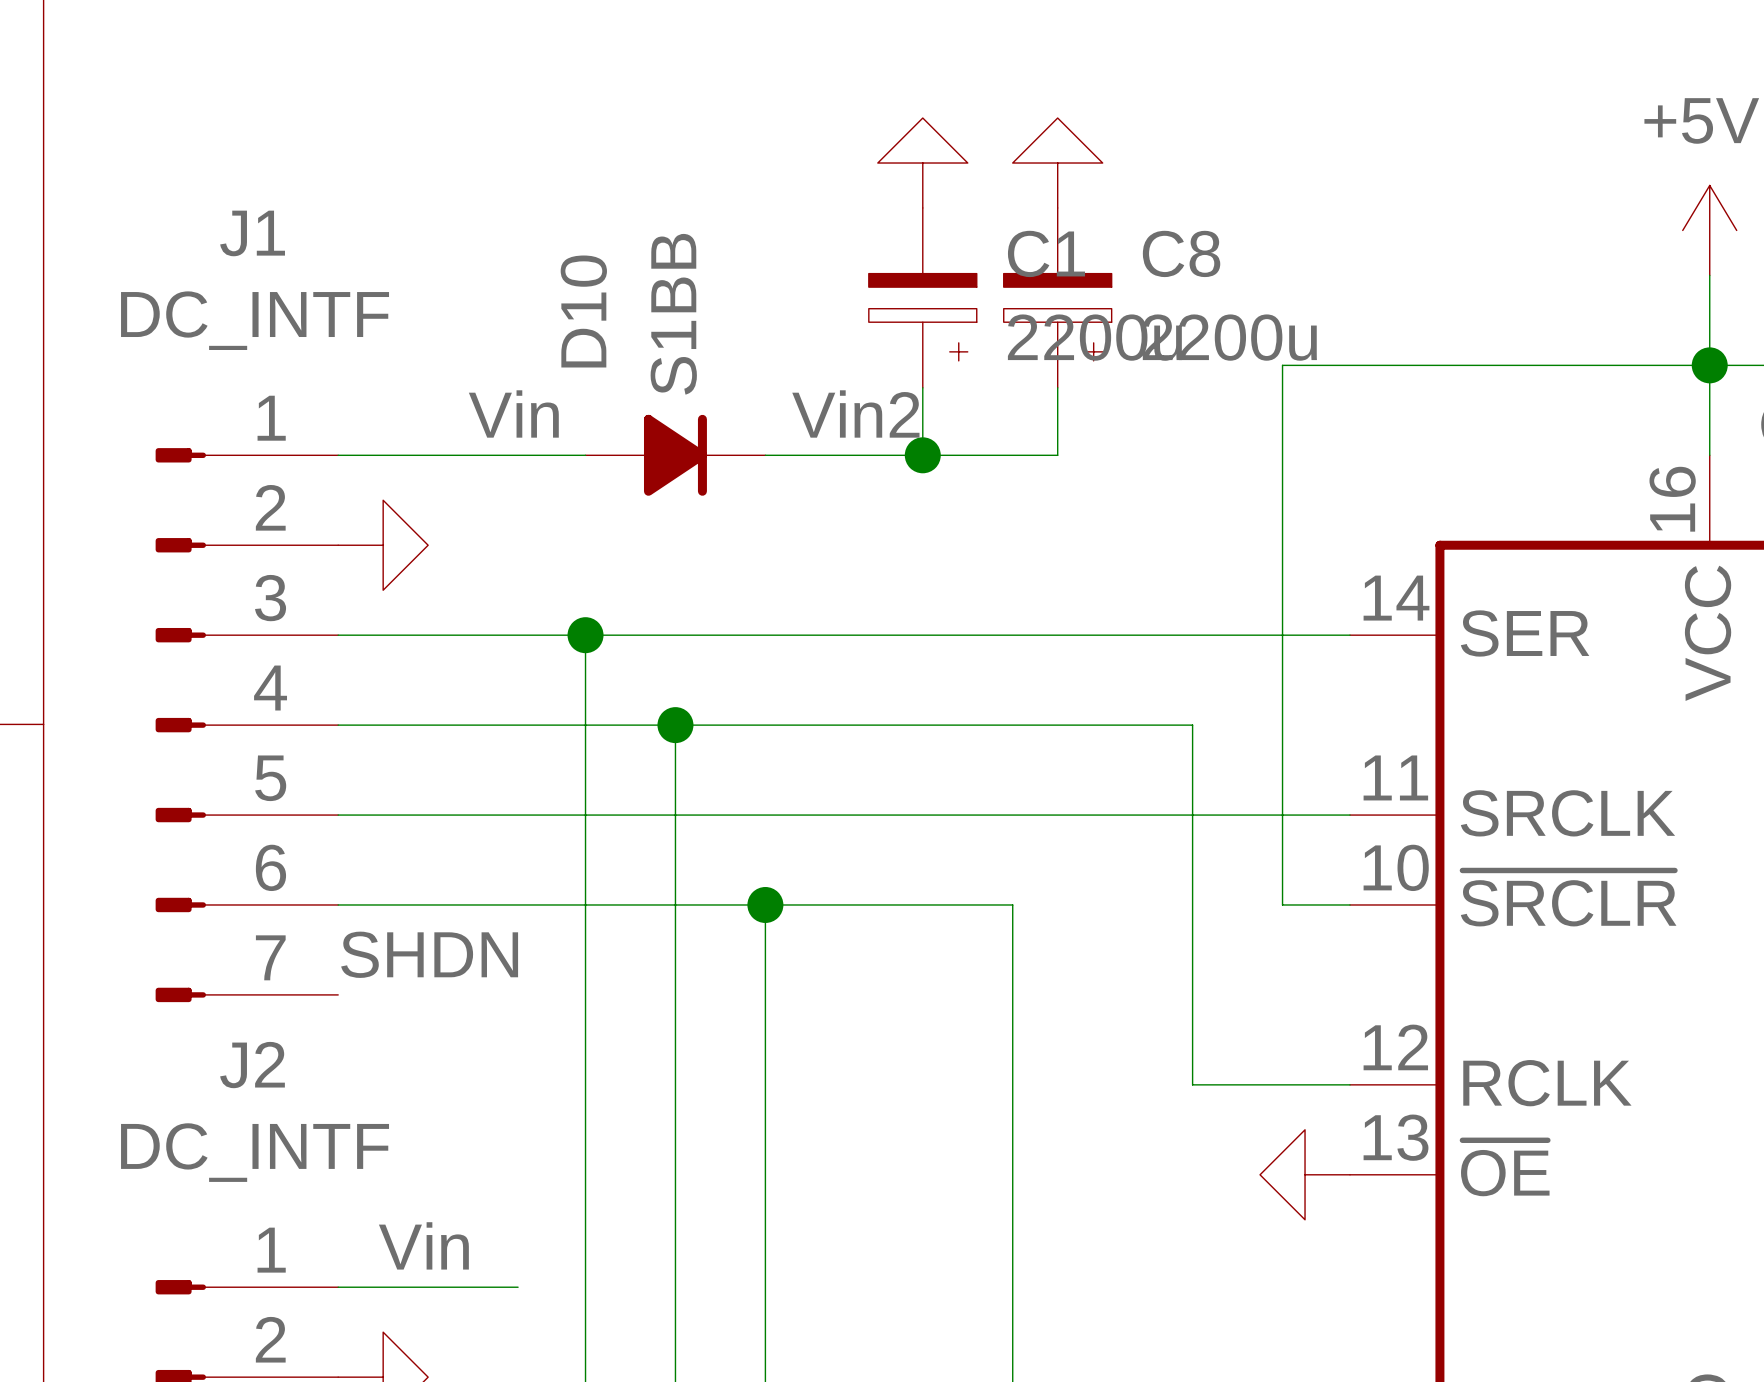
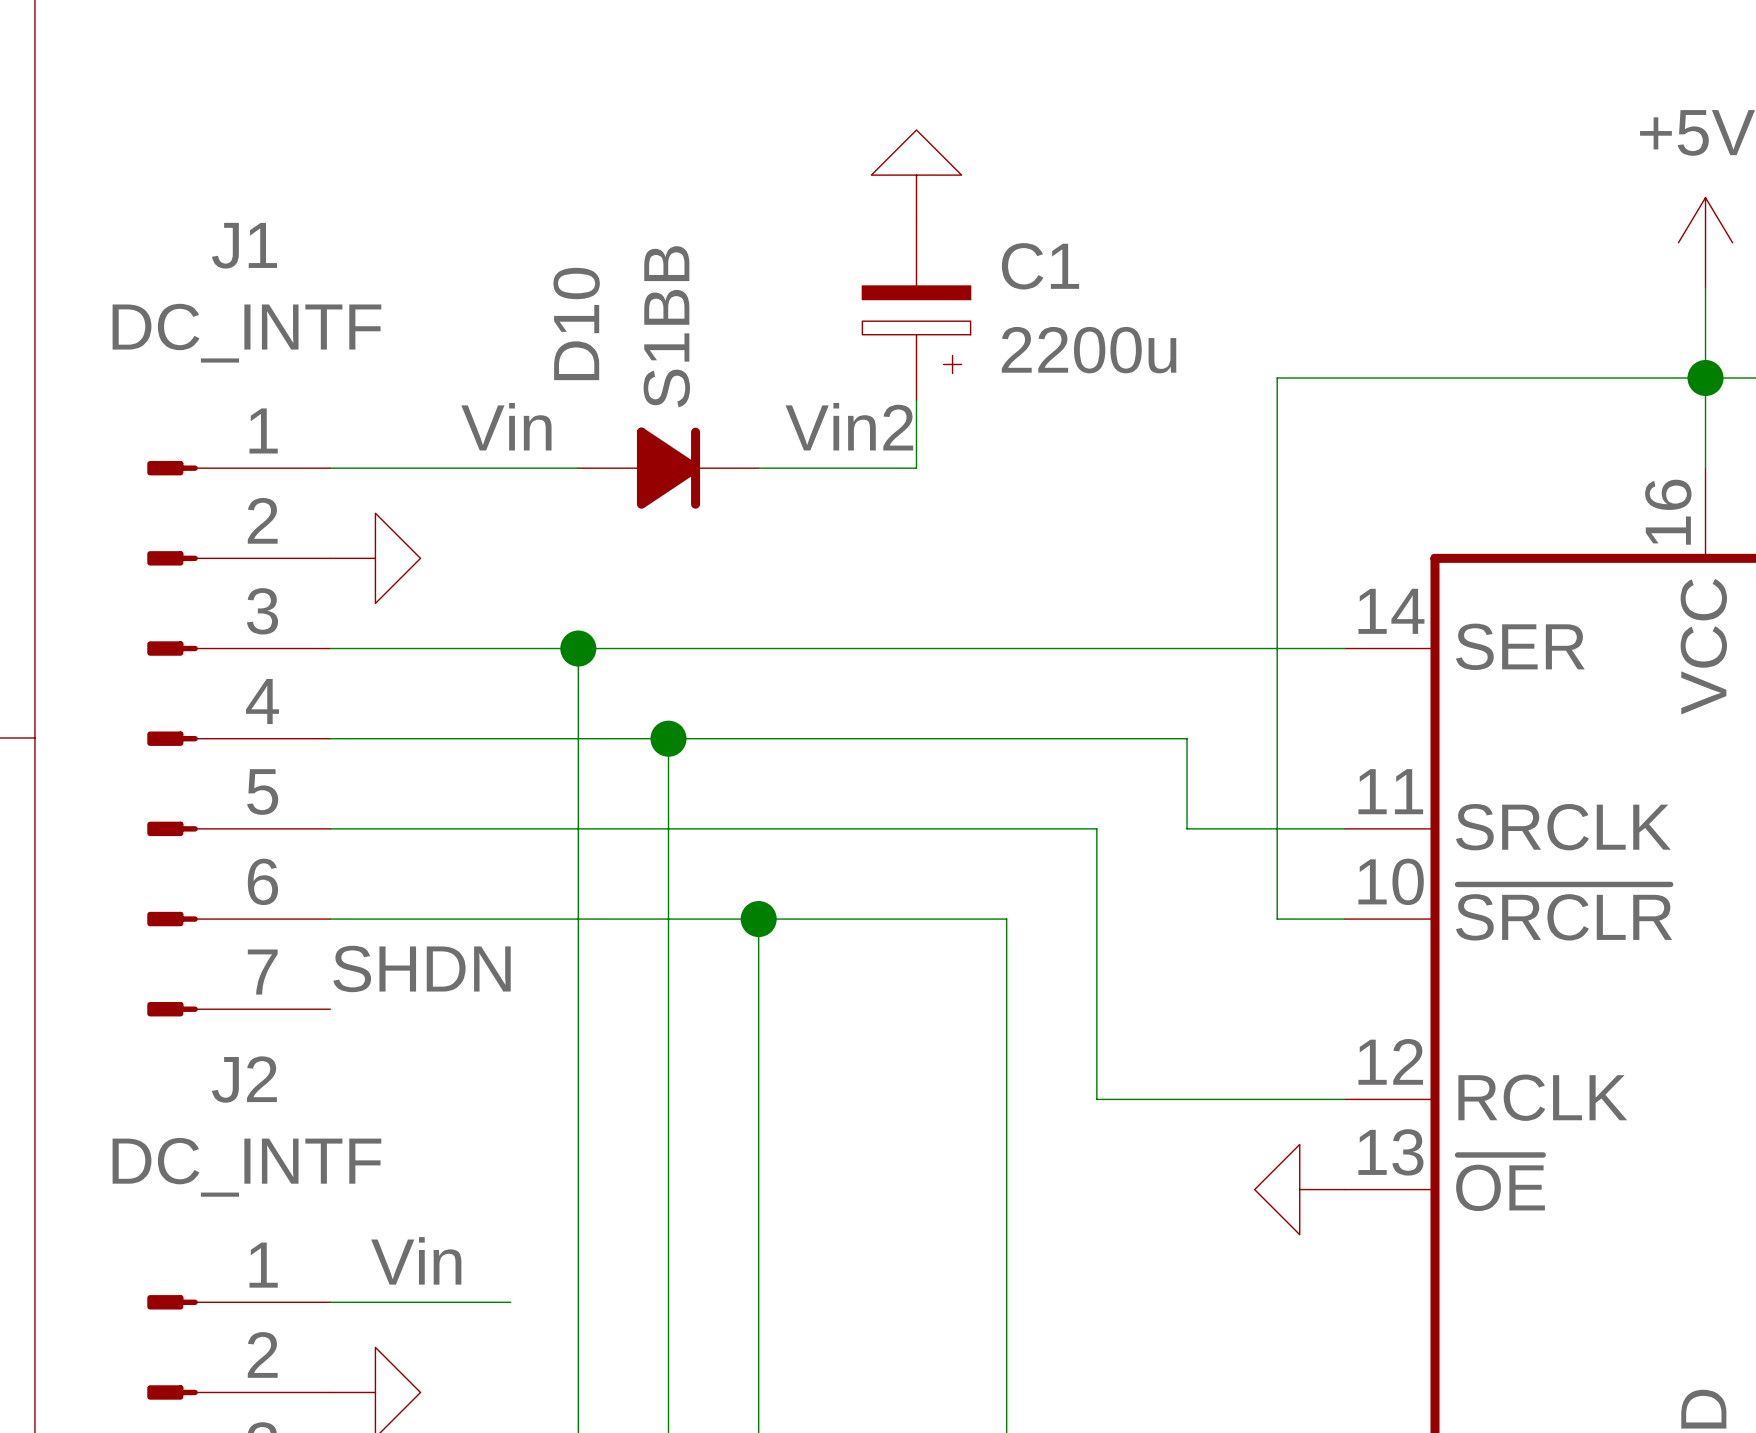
power symbol: (1057, 163) -> none
C8: 2200u (1057, 297) -> none
wire: (1057, 387) (1057, 455) (922, 455) -> none
junction: (922, 455) -> none
wire: (1102, 815) (1192, 815) (1192, 1084) -> (1096, 828) (1096, 1099) (1187, 1099)

